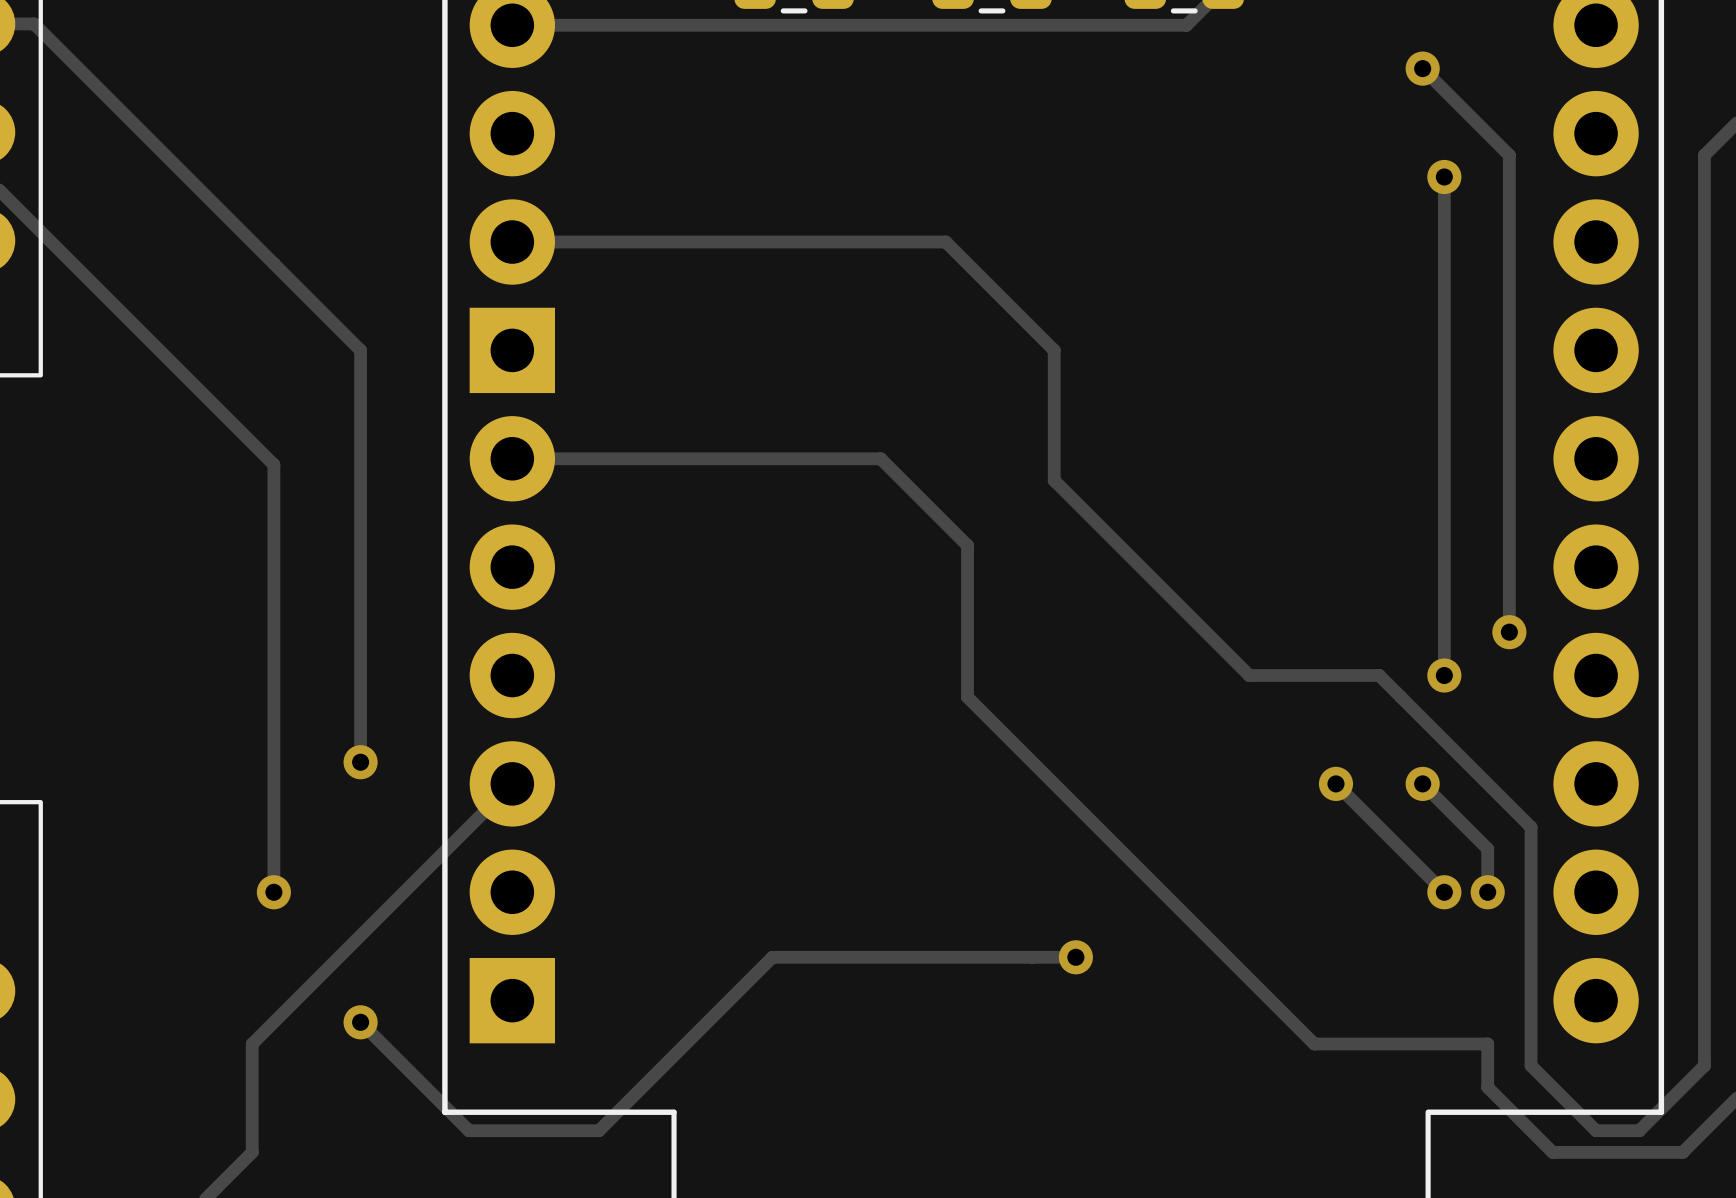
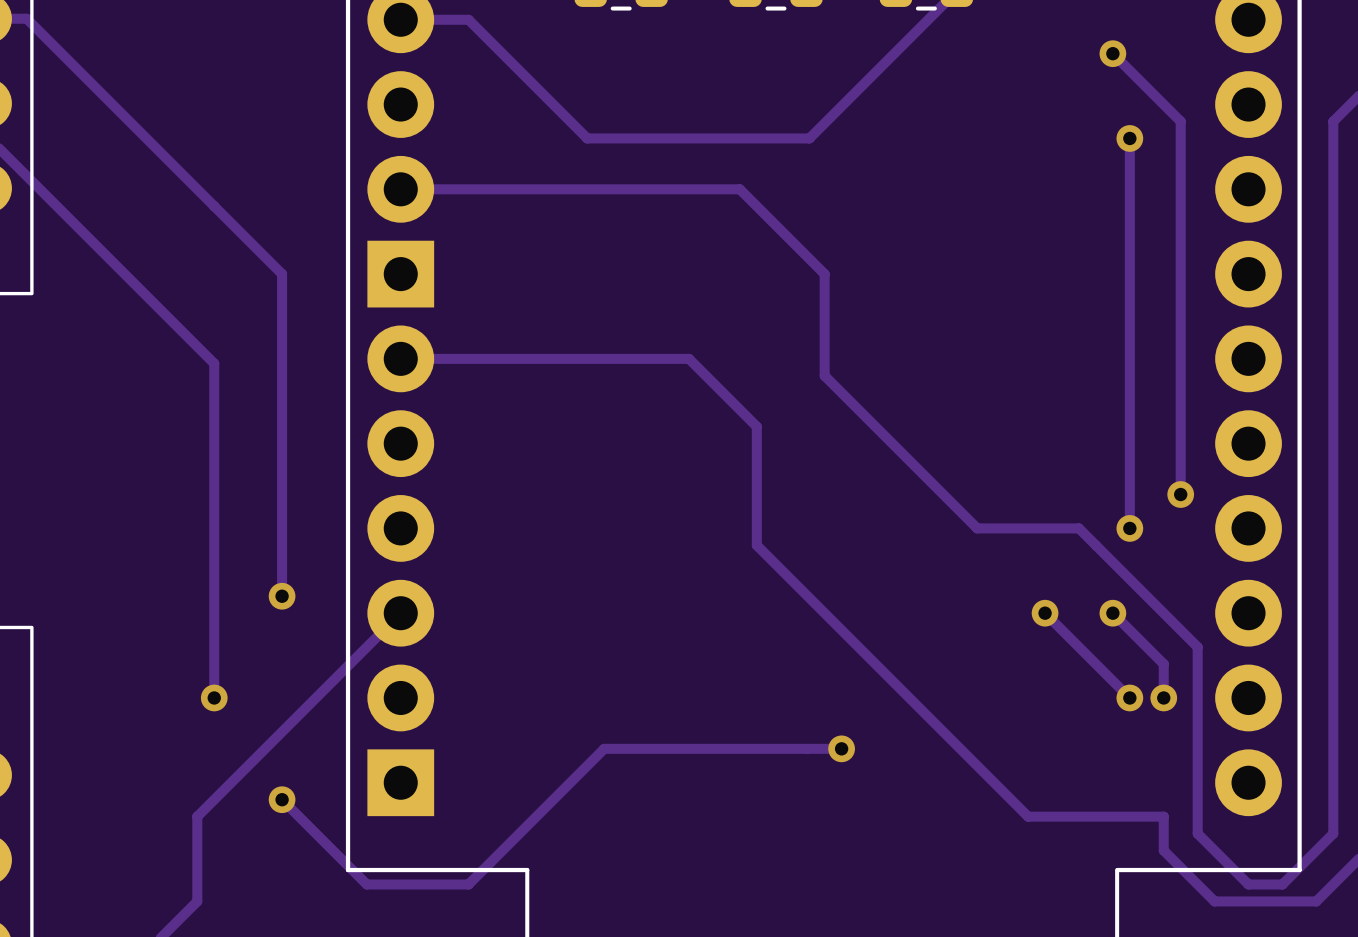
track: (599, 25) (1186, 25) -> (468, 19) (587, 138) (809, 138) (928, 19)

